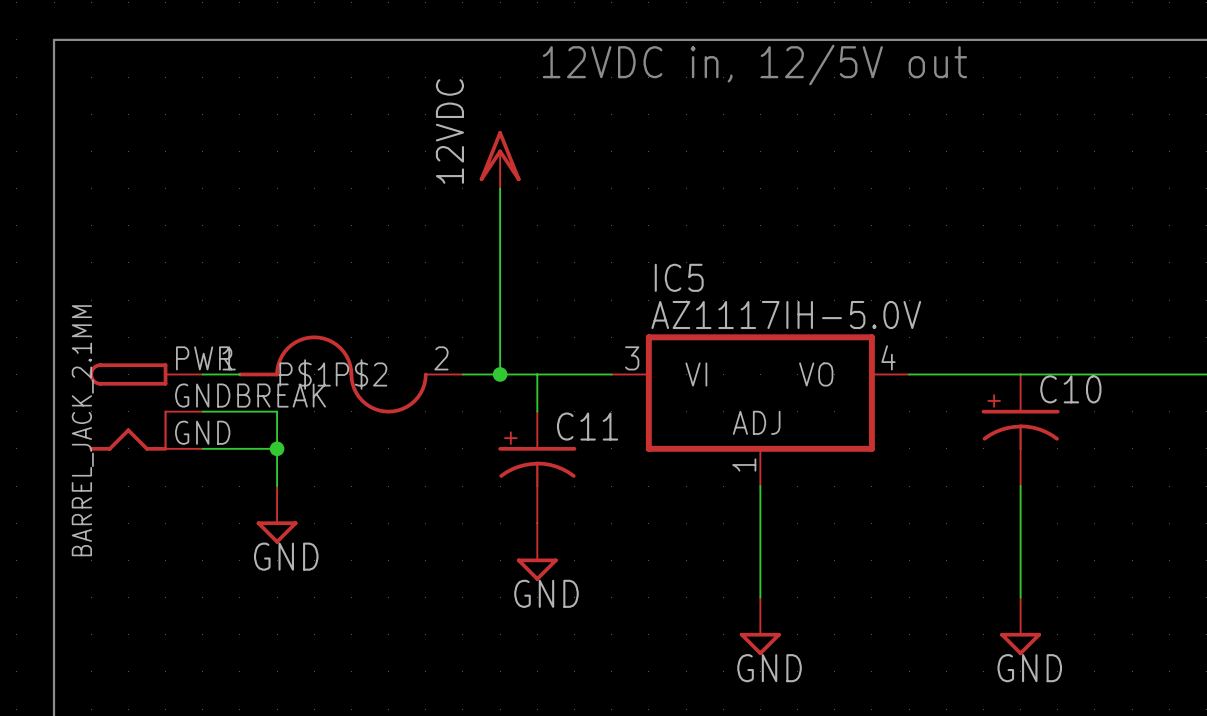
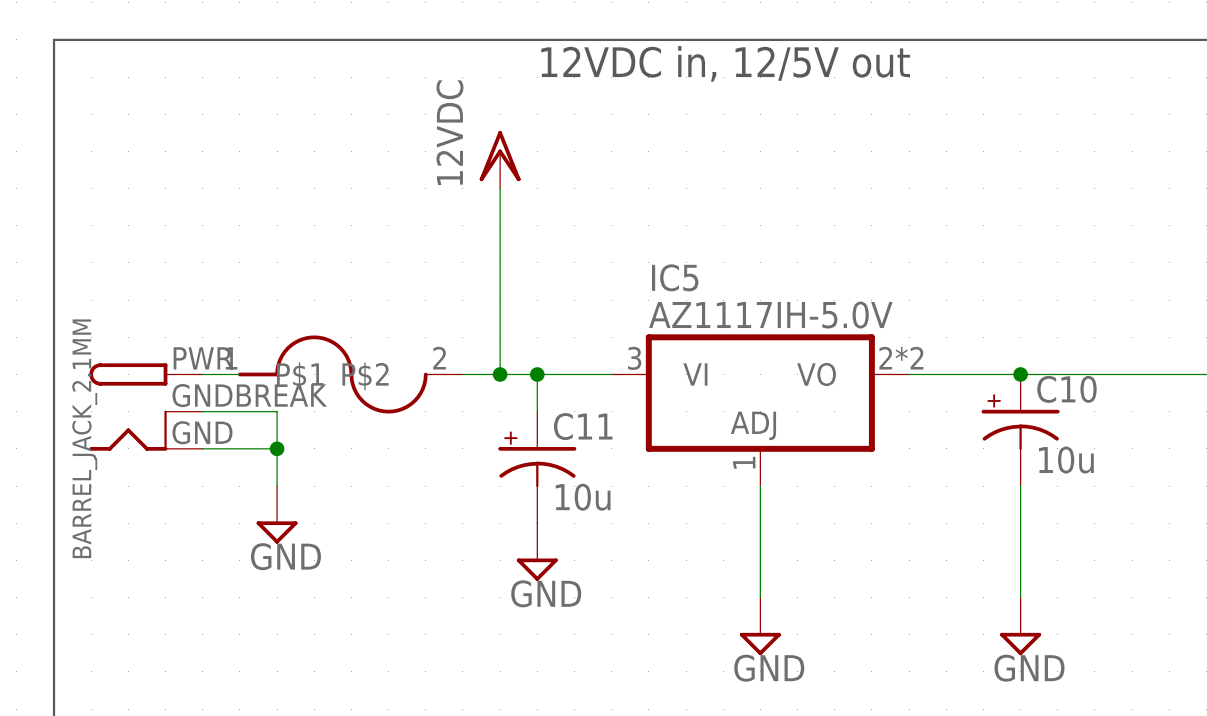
IC5 pin number: 4 (888, 357) -> 2*2 (901, 358)
junction: none -> (537, 374)
junction: none -> (1020, 374)
C10 value: none -> 10u (1066, 460)
C11 value: none -> 10u (583, 497)

